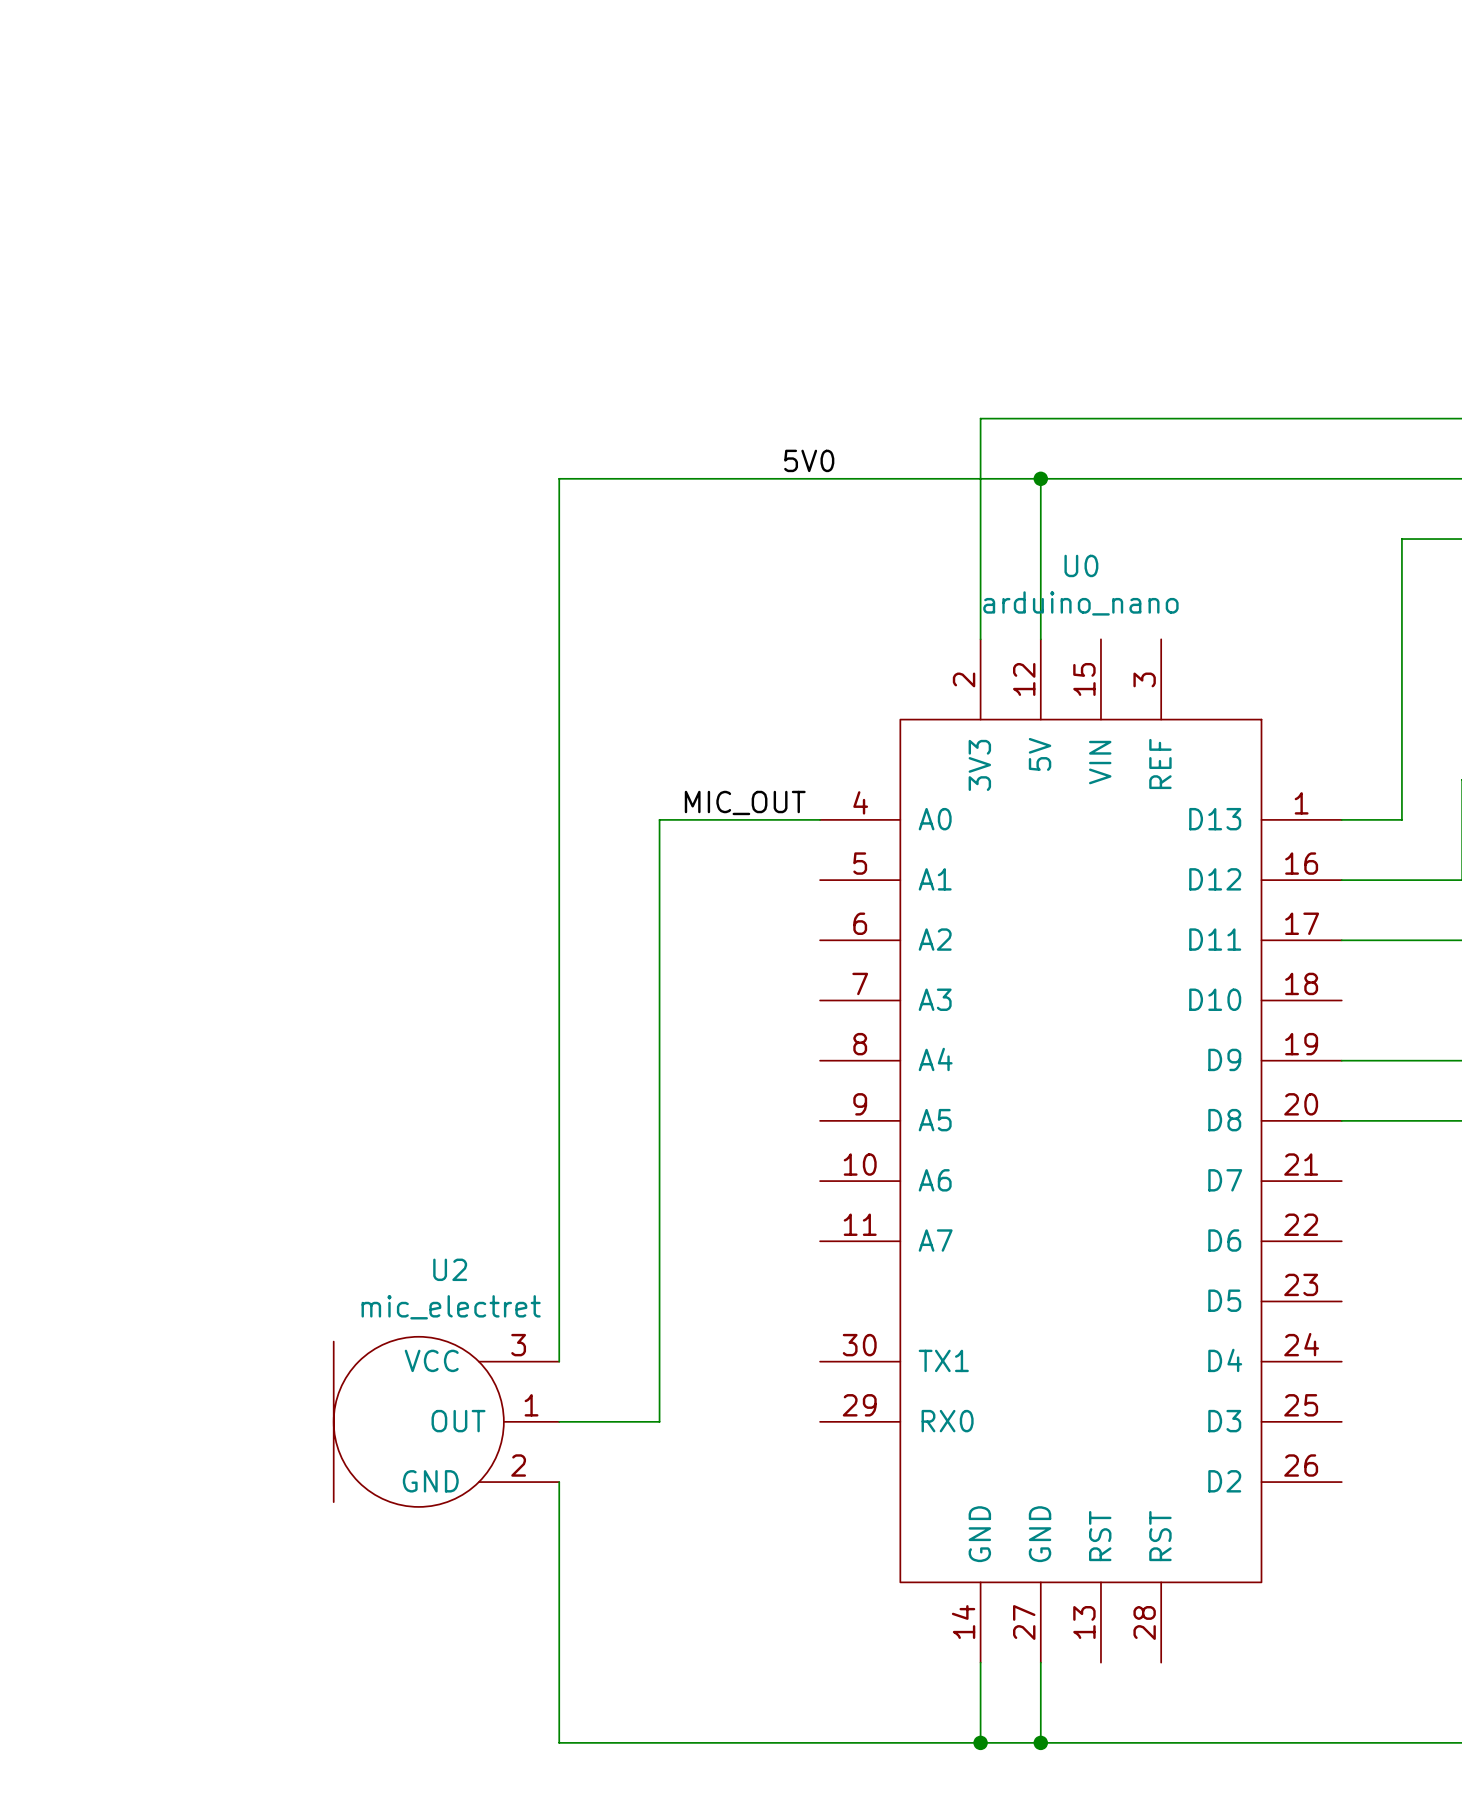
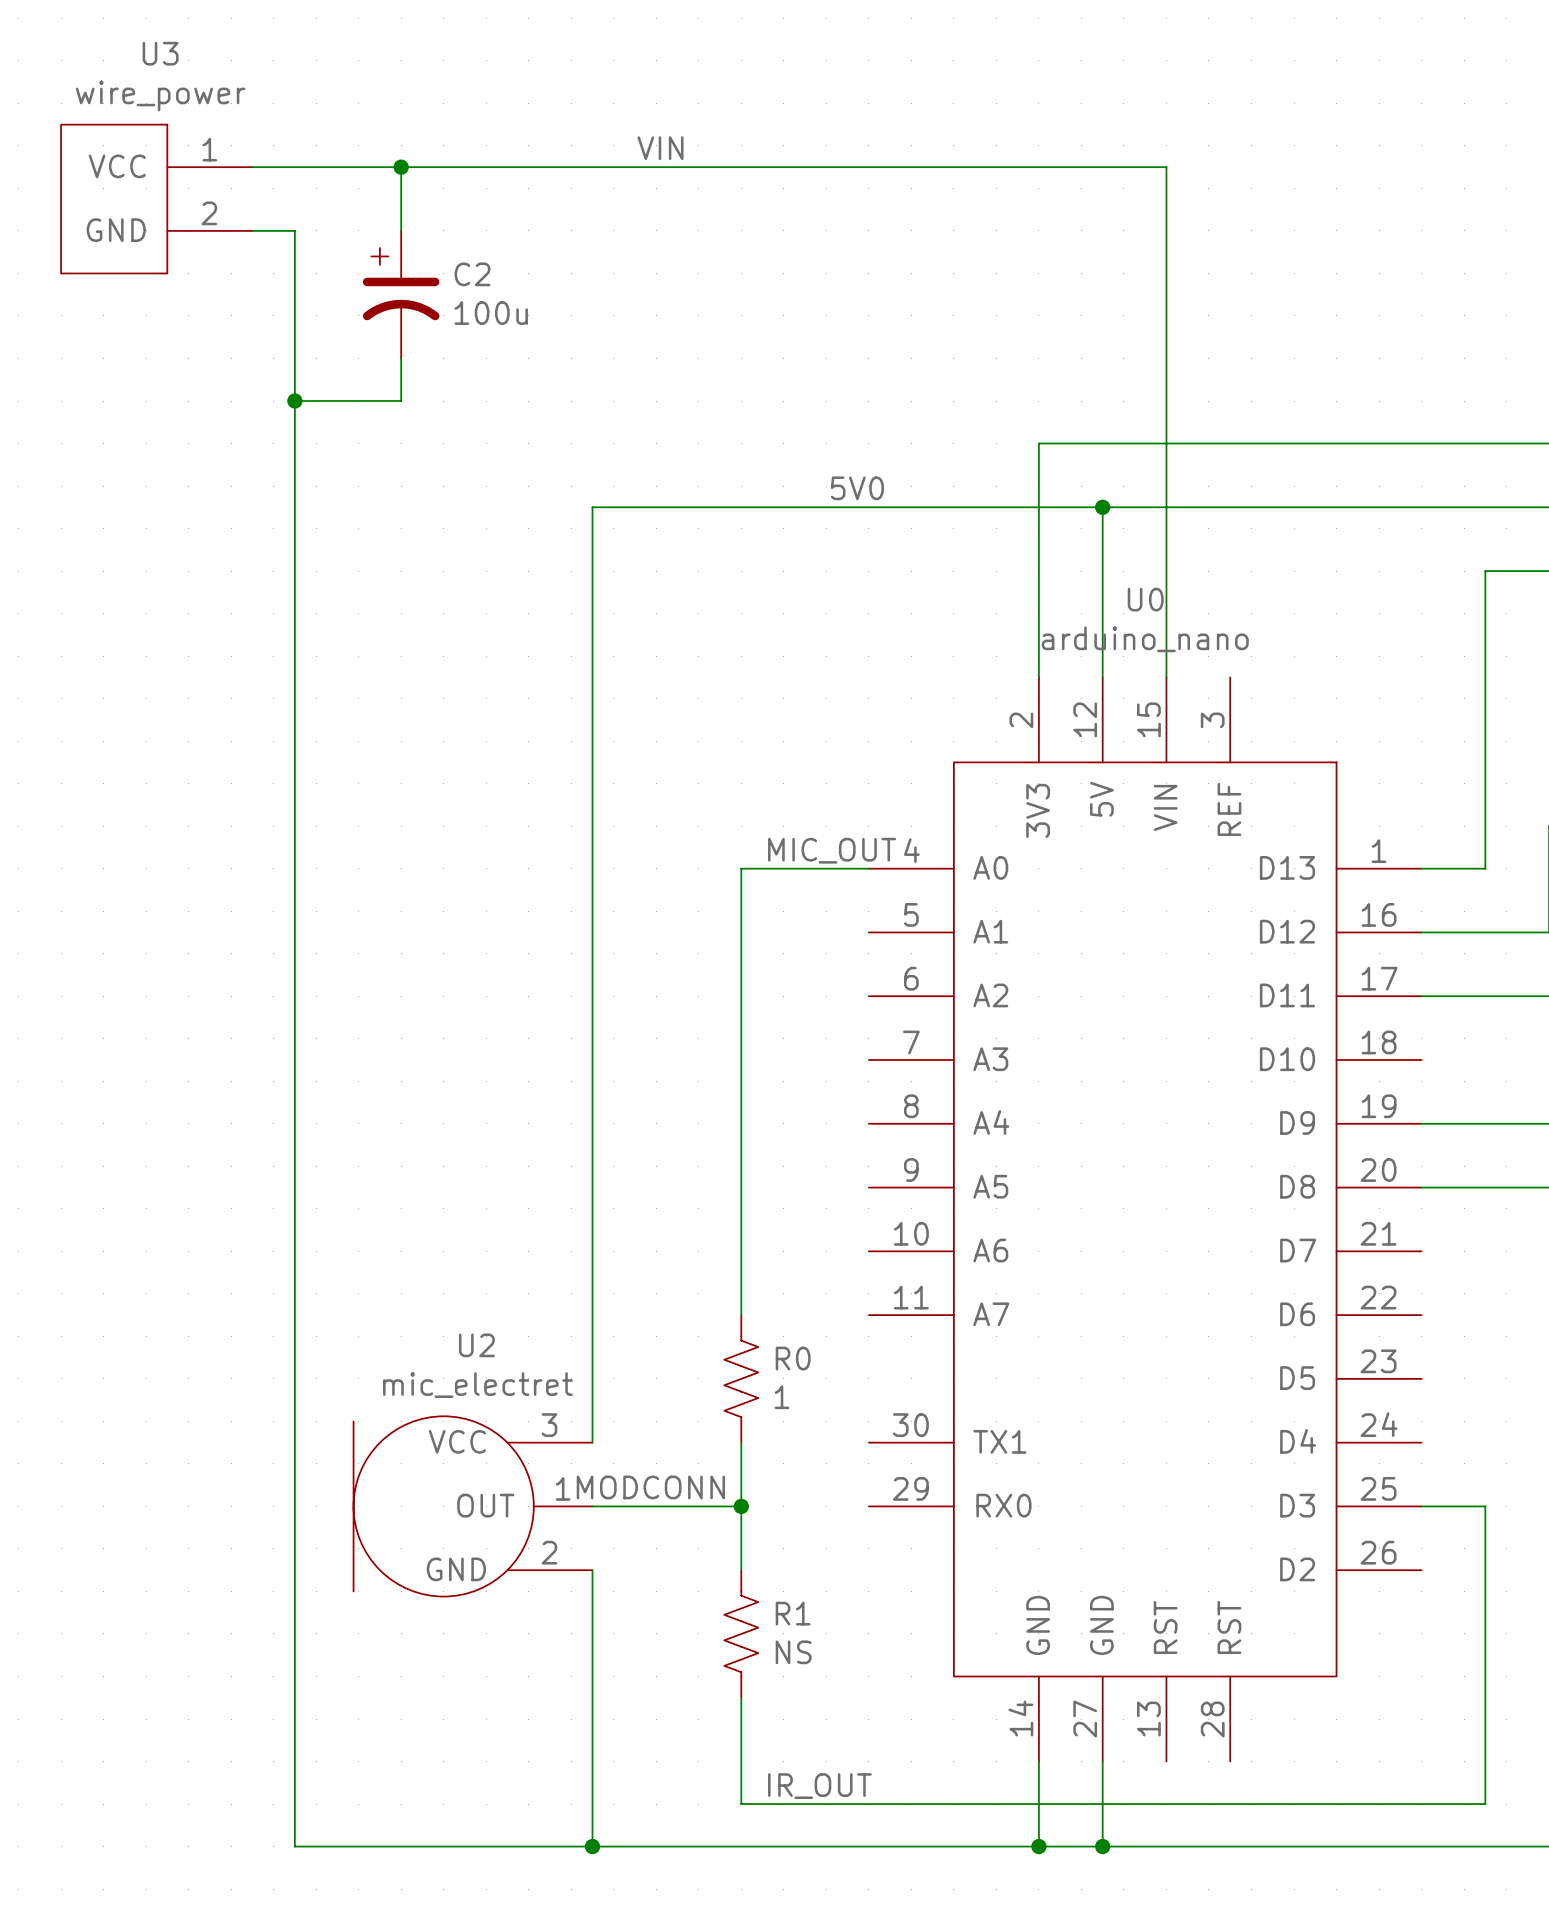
label: none -> VIN (660, 148)
wire: none -> (252, 167) (1166, 167) (1166, 677)
wire: none -> (401, 167) (401, 230)
junction: none -> (401, 167)
U3: none -> wire_power (156, 199)
wire: none -> (252, 230) (294, 230) (294, 1846) (592, 1846)
C2: none -> 100u (401, 294)
wire: none -> (401, 358) (401, 401) (294, 401)
junction: none -> (294, 401)
label position: MIC_OUT (745, 802) -> MIC_OUT (832, 850)
wire: (699, 819) (659, 819) (659, 1421) -> (741, 868) (741, 1315)
R0: none -> 1 (741, 1378)
wire: none -> (741, 1442) (741, 1570)
label: none -> MODCONN (650, 1487)
wire: none -> (698, 1506) (741, 1506)
junction: none -> (741, 1506)
wire: none -> (1421, 1506) (1485, 1506) (1485, 1804) (741, 1804) (741, 1697)
R1: none -> NS (741, 1633)
label: none -> IR_OUT (819, 1786)
junction: none -> (592, 1846)

